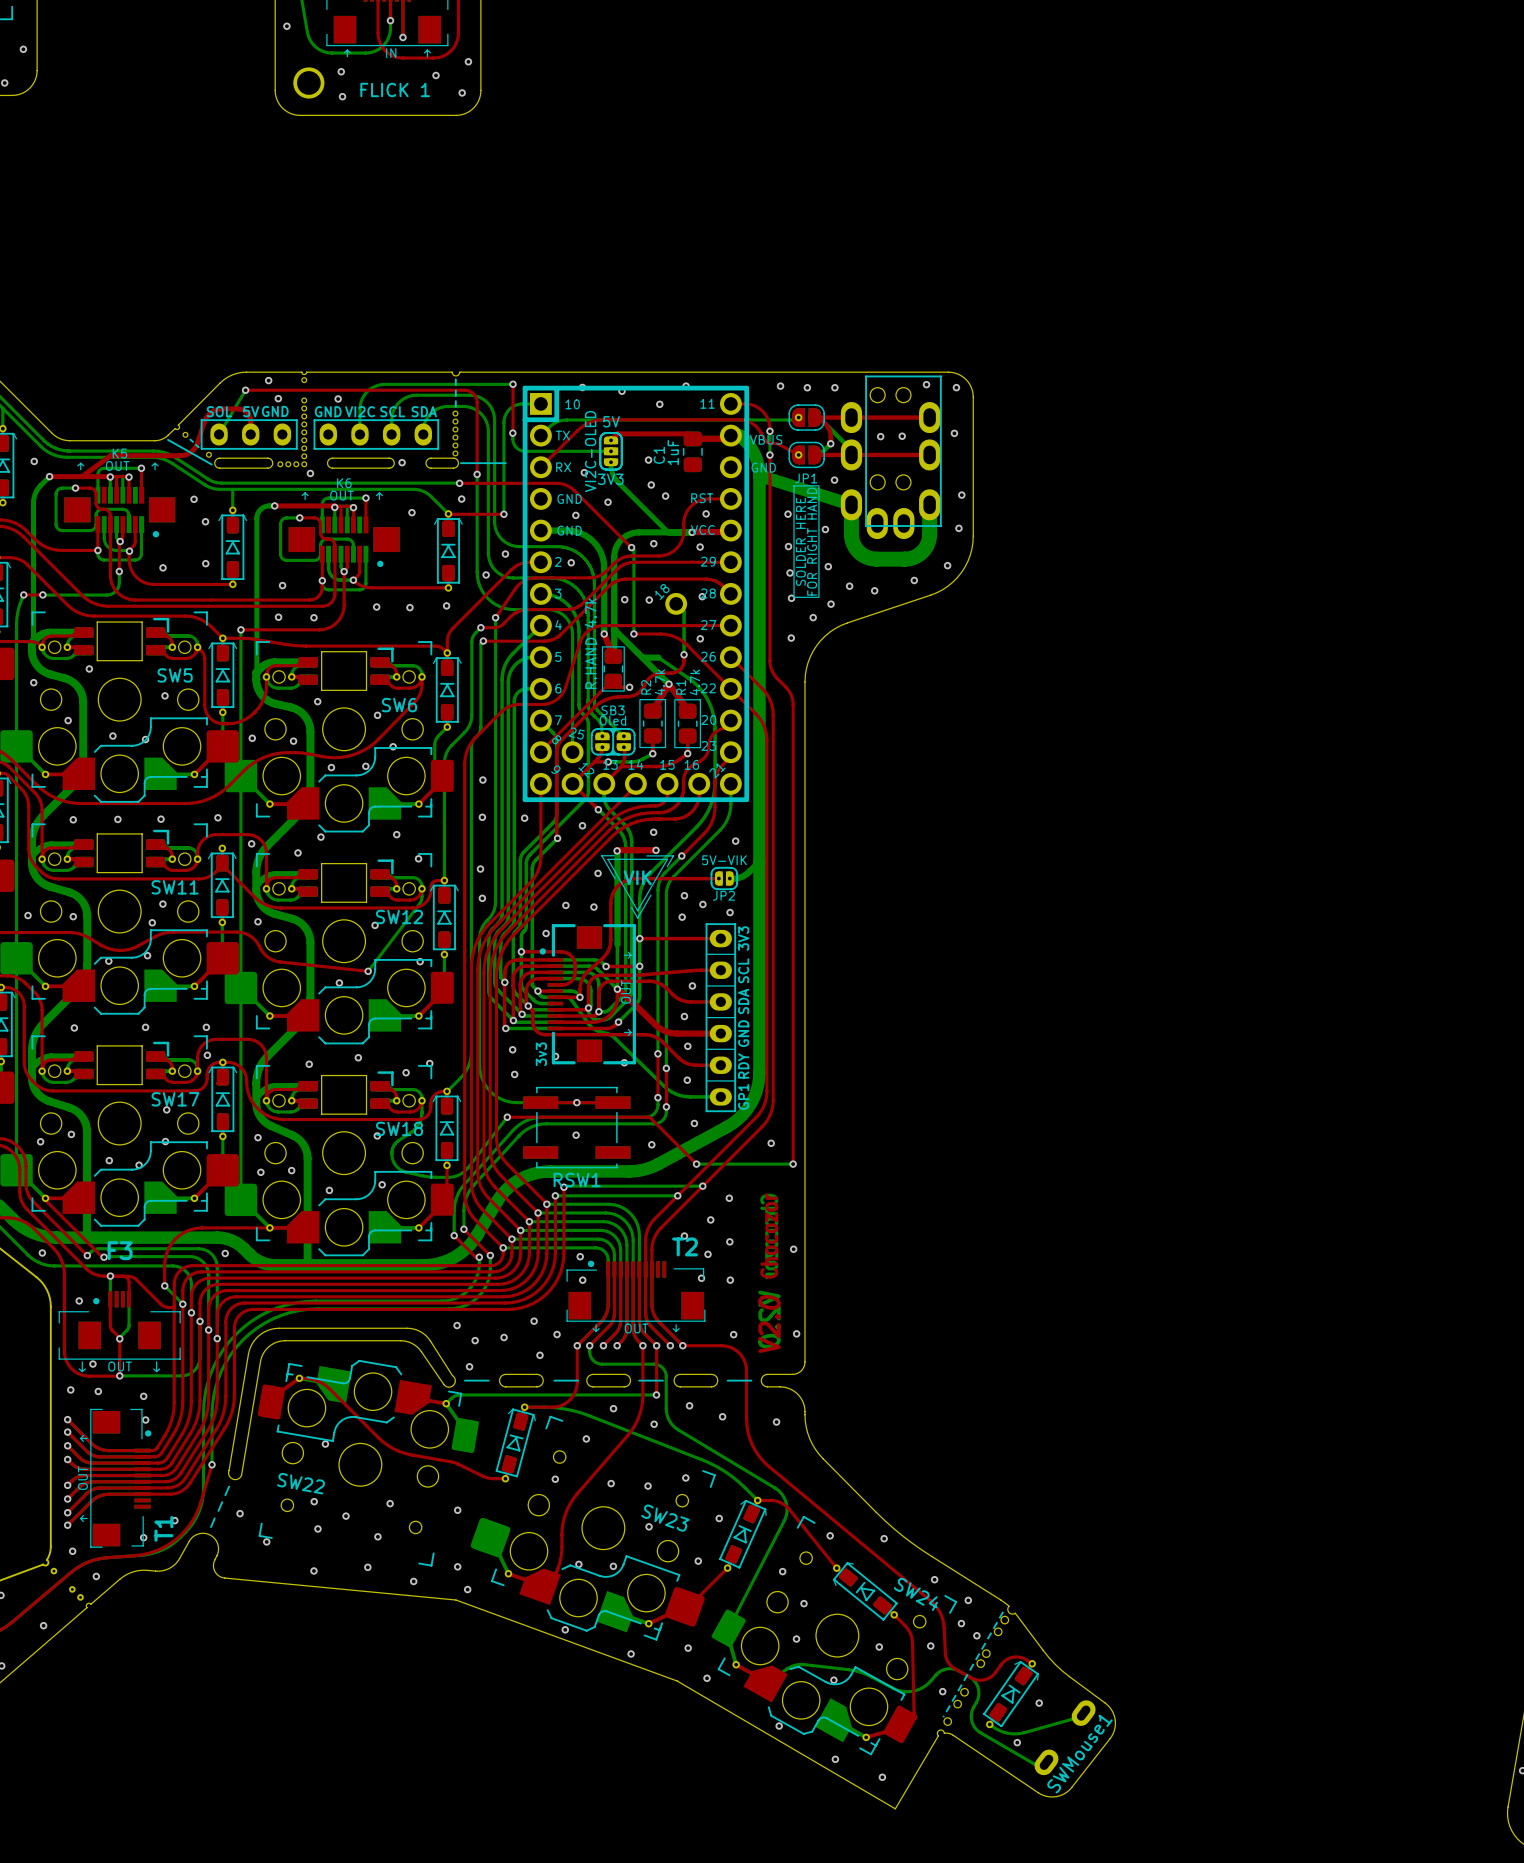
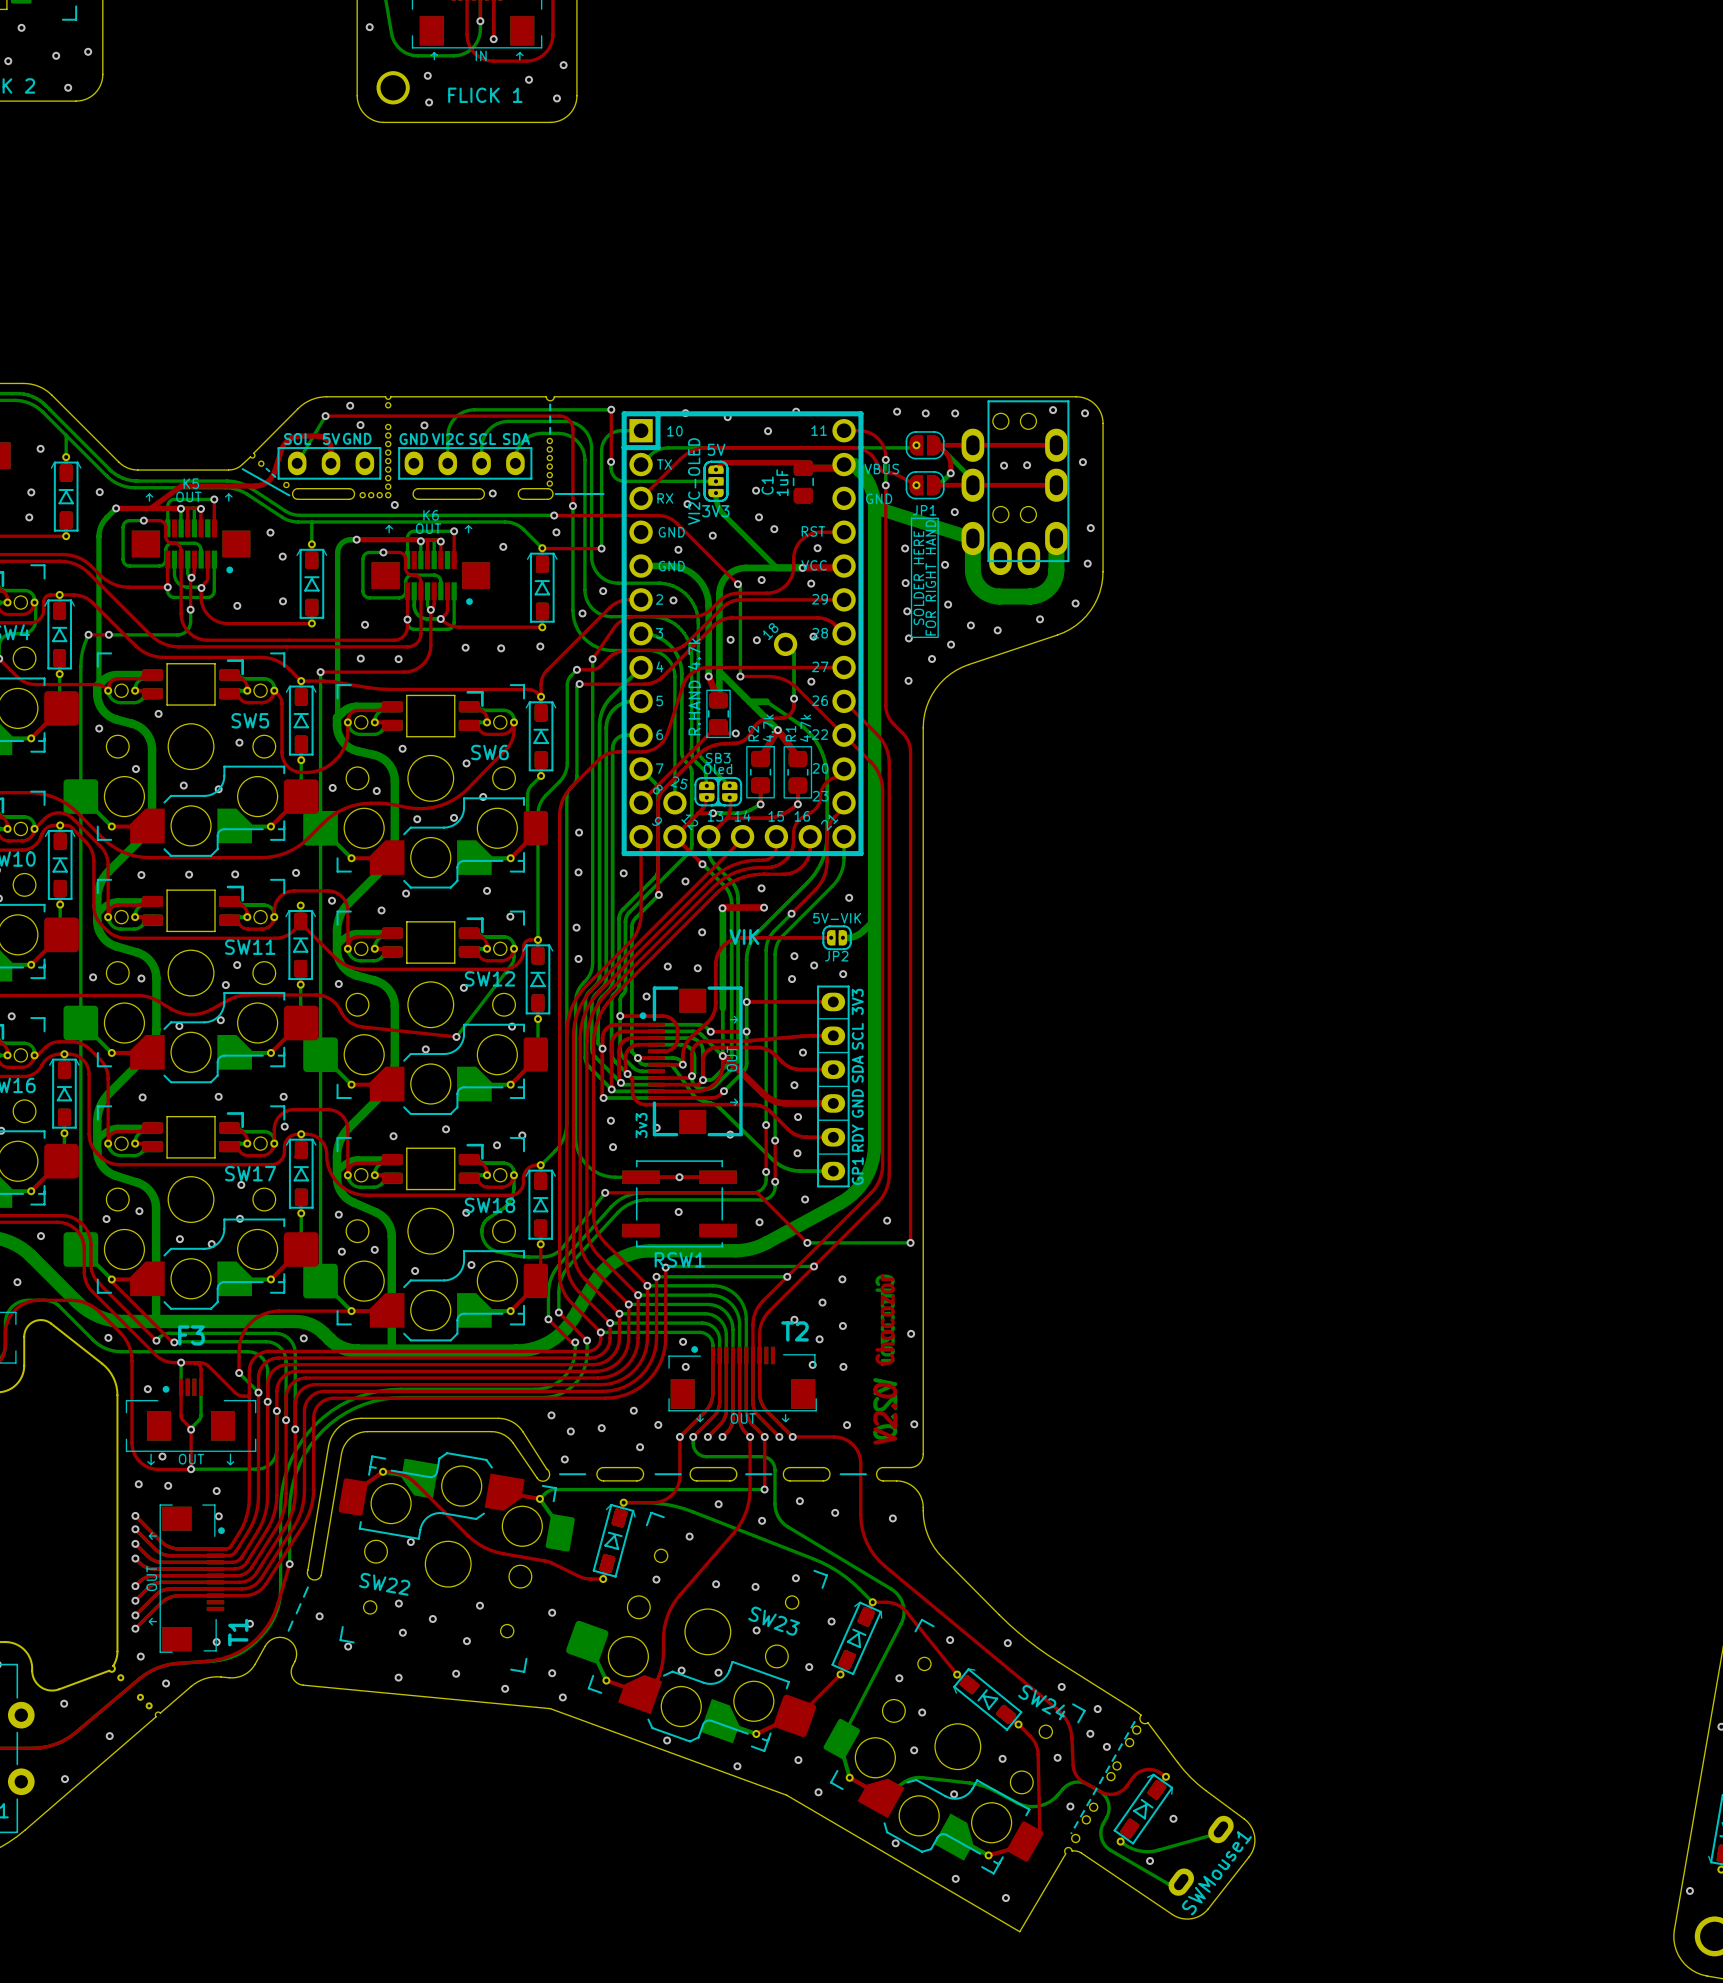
drawing: [601, 855, 675, 919] -> none

